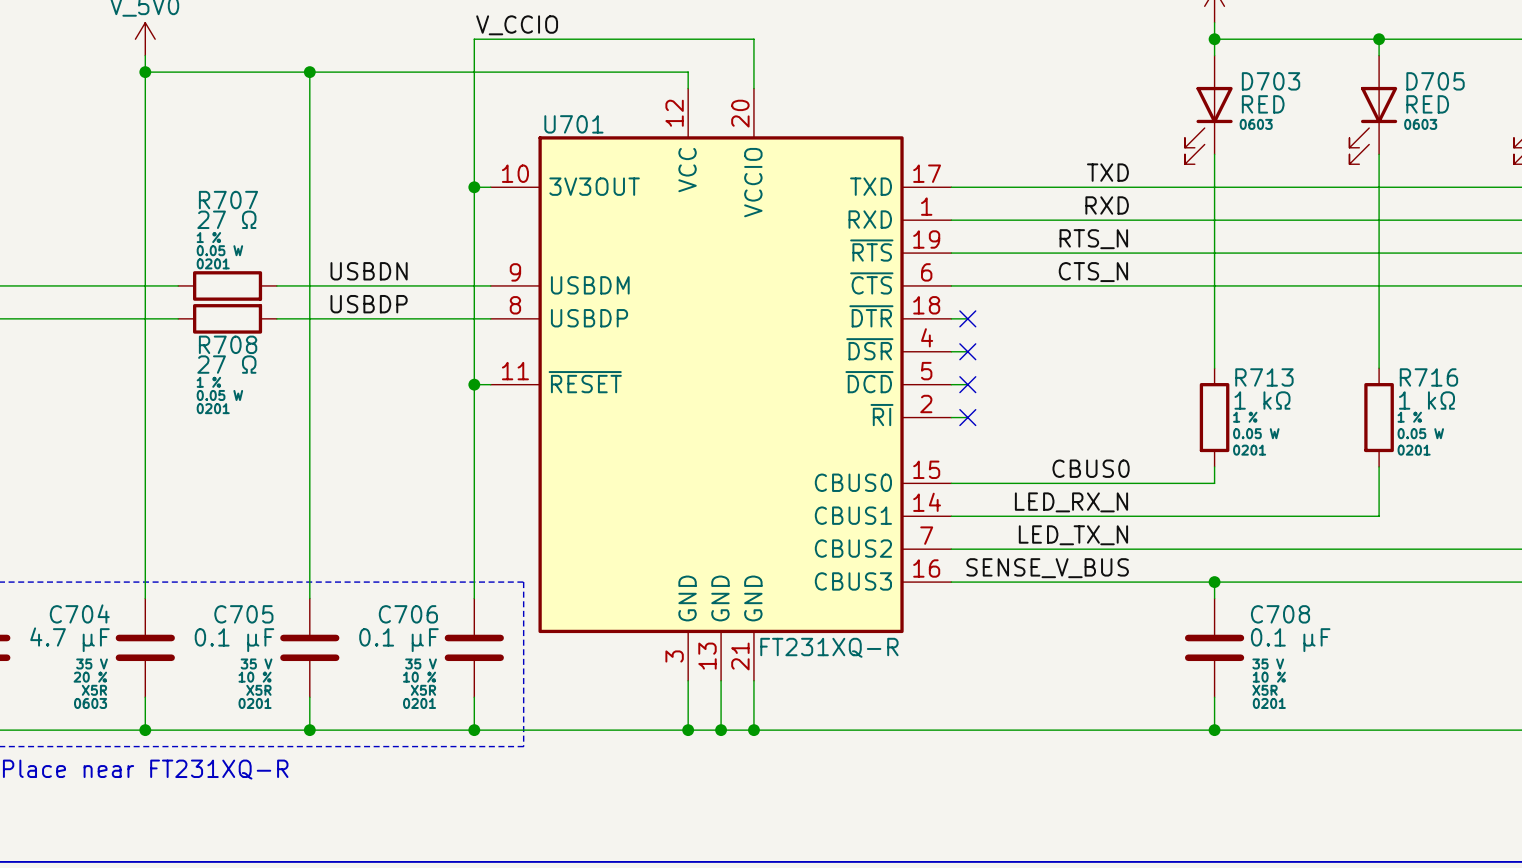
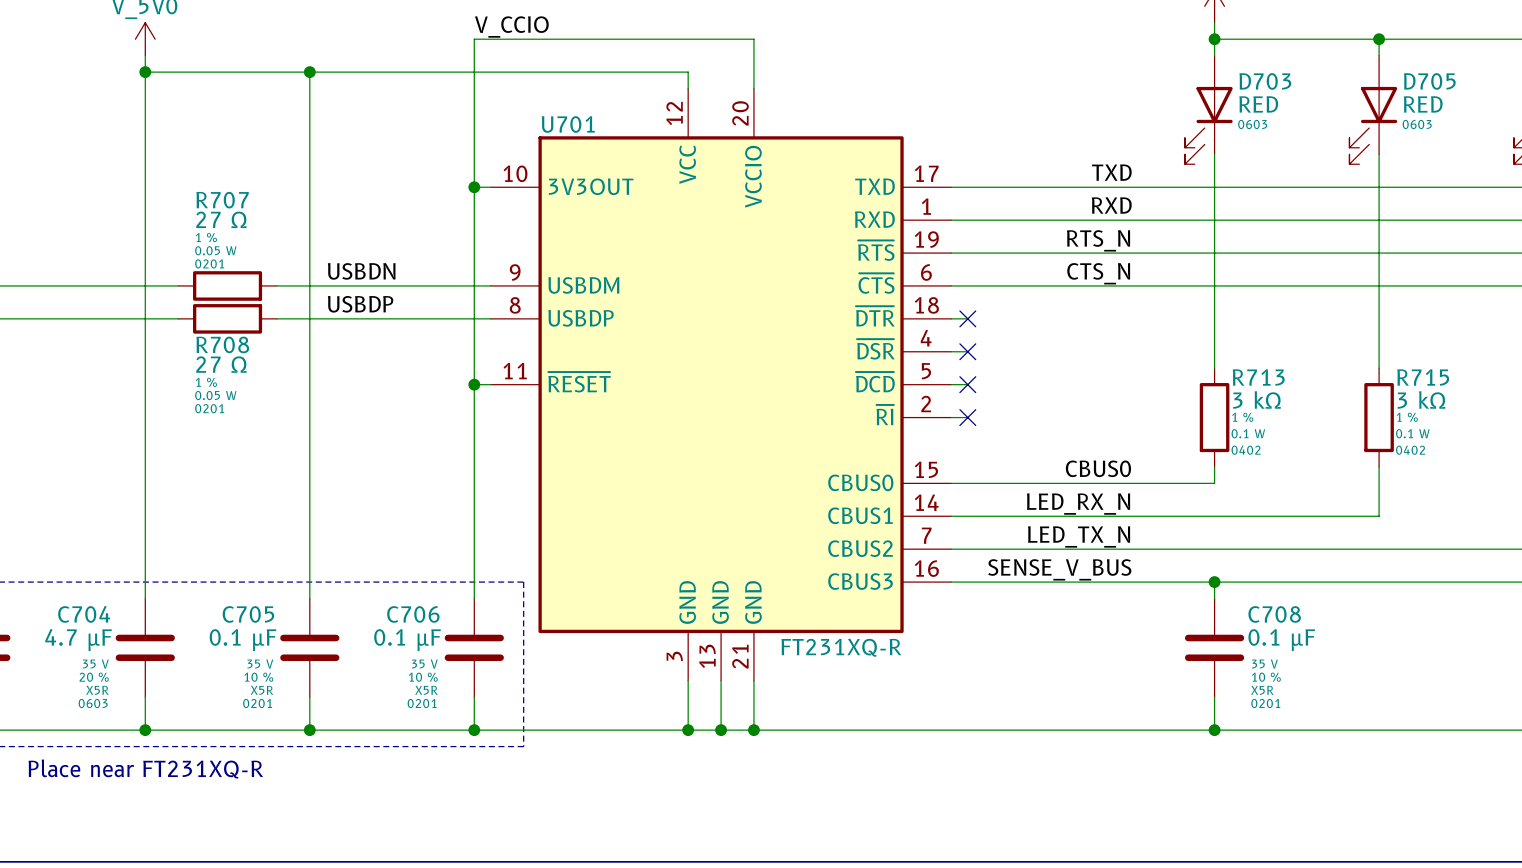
R716 name: R716 (1428, 377) -> R715 (1423, 377)
R713 value: 1 kΩ (1262, 400) -> 3 kΩ (1256, 399)
R716 value: 1 kΩ (1426, 400) -> 3 kΩ (1421, 399)
R713 text: 0.05 W (1256, 433) -> 0.1 W (1248, 433)
R716 text: 0.05 W (1420, 433) -> 0.1 W (1412, 433)
R713 text: 0201 (1249, 450) -> 0402 (1246, 450)
R716 text: 0201 (1414, 450) -> 0402 (1410, 450)

